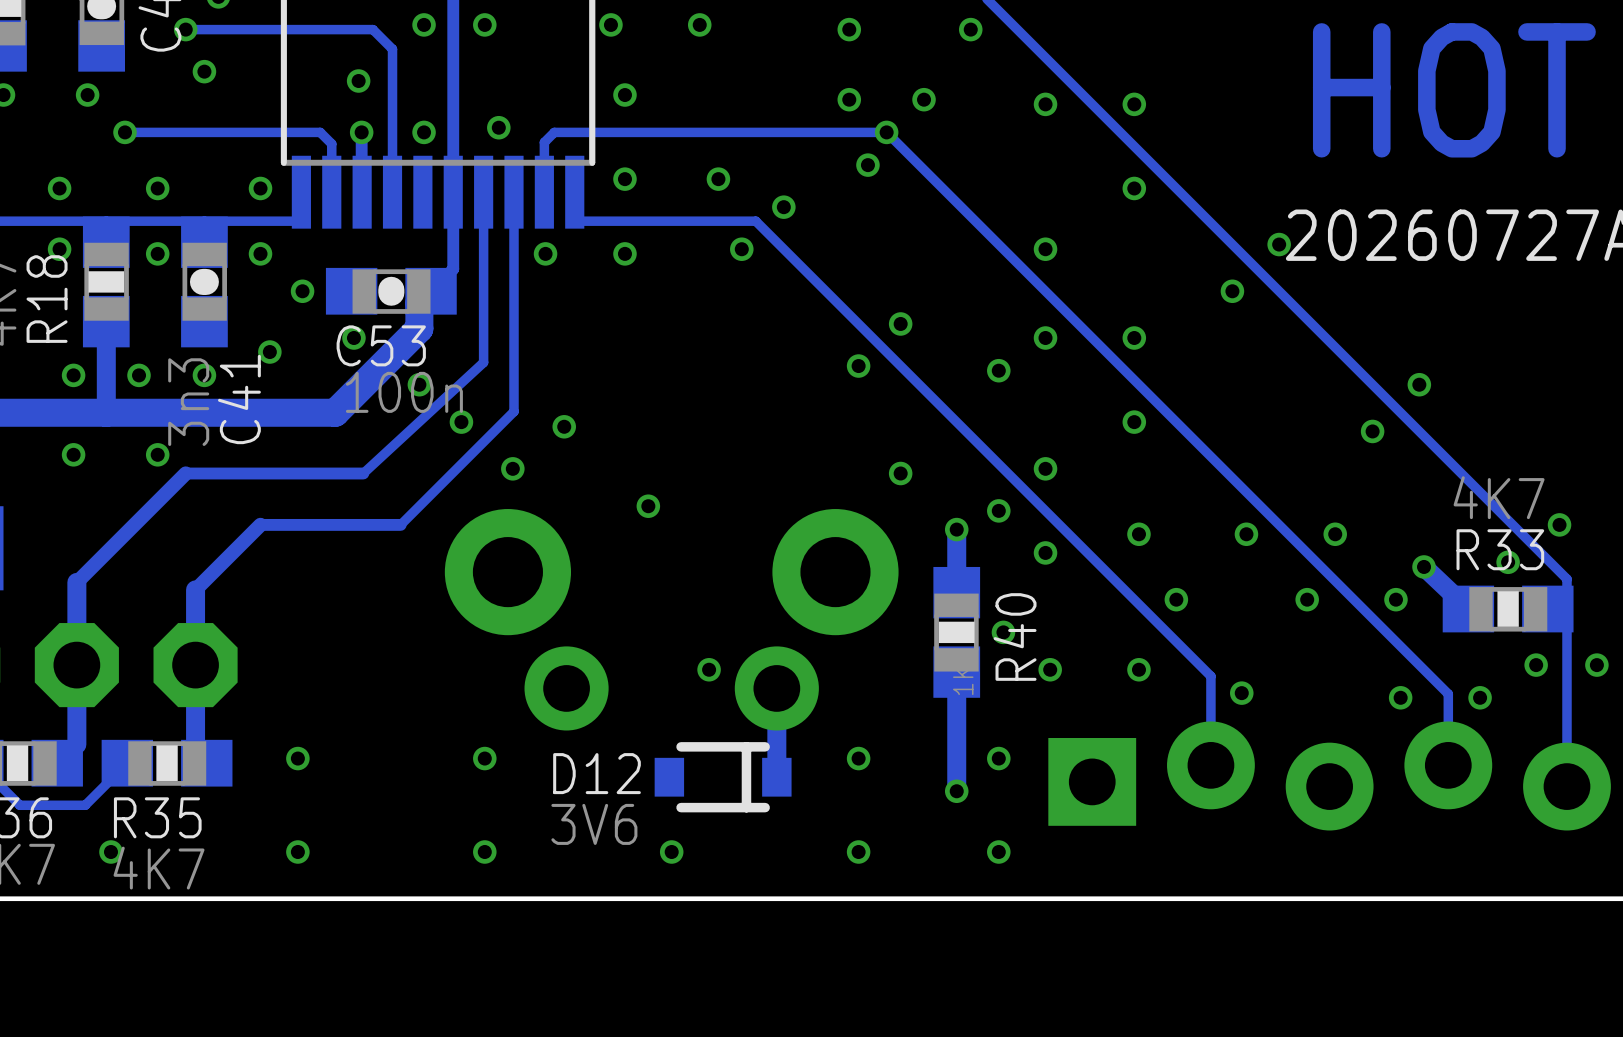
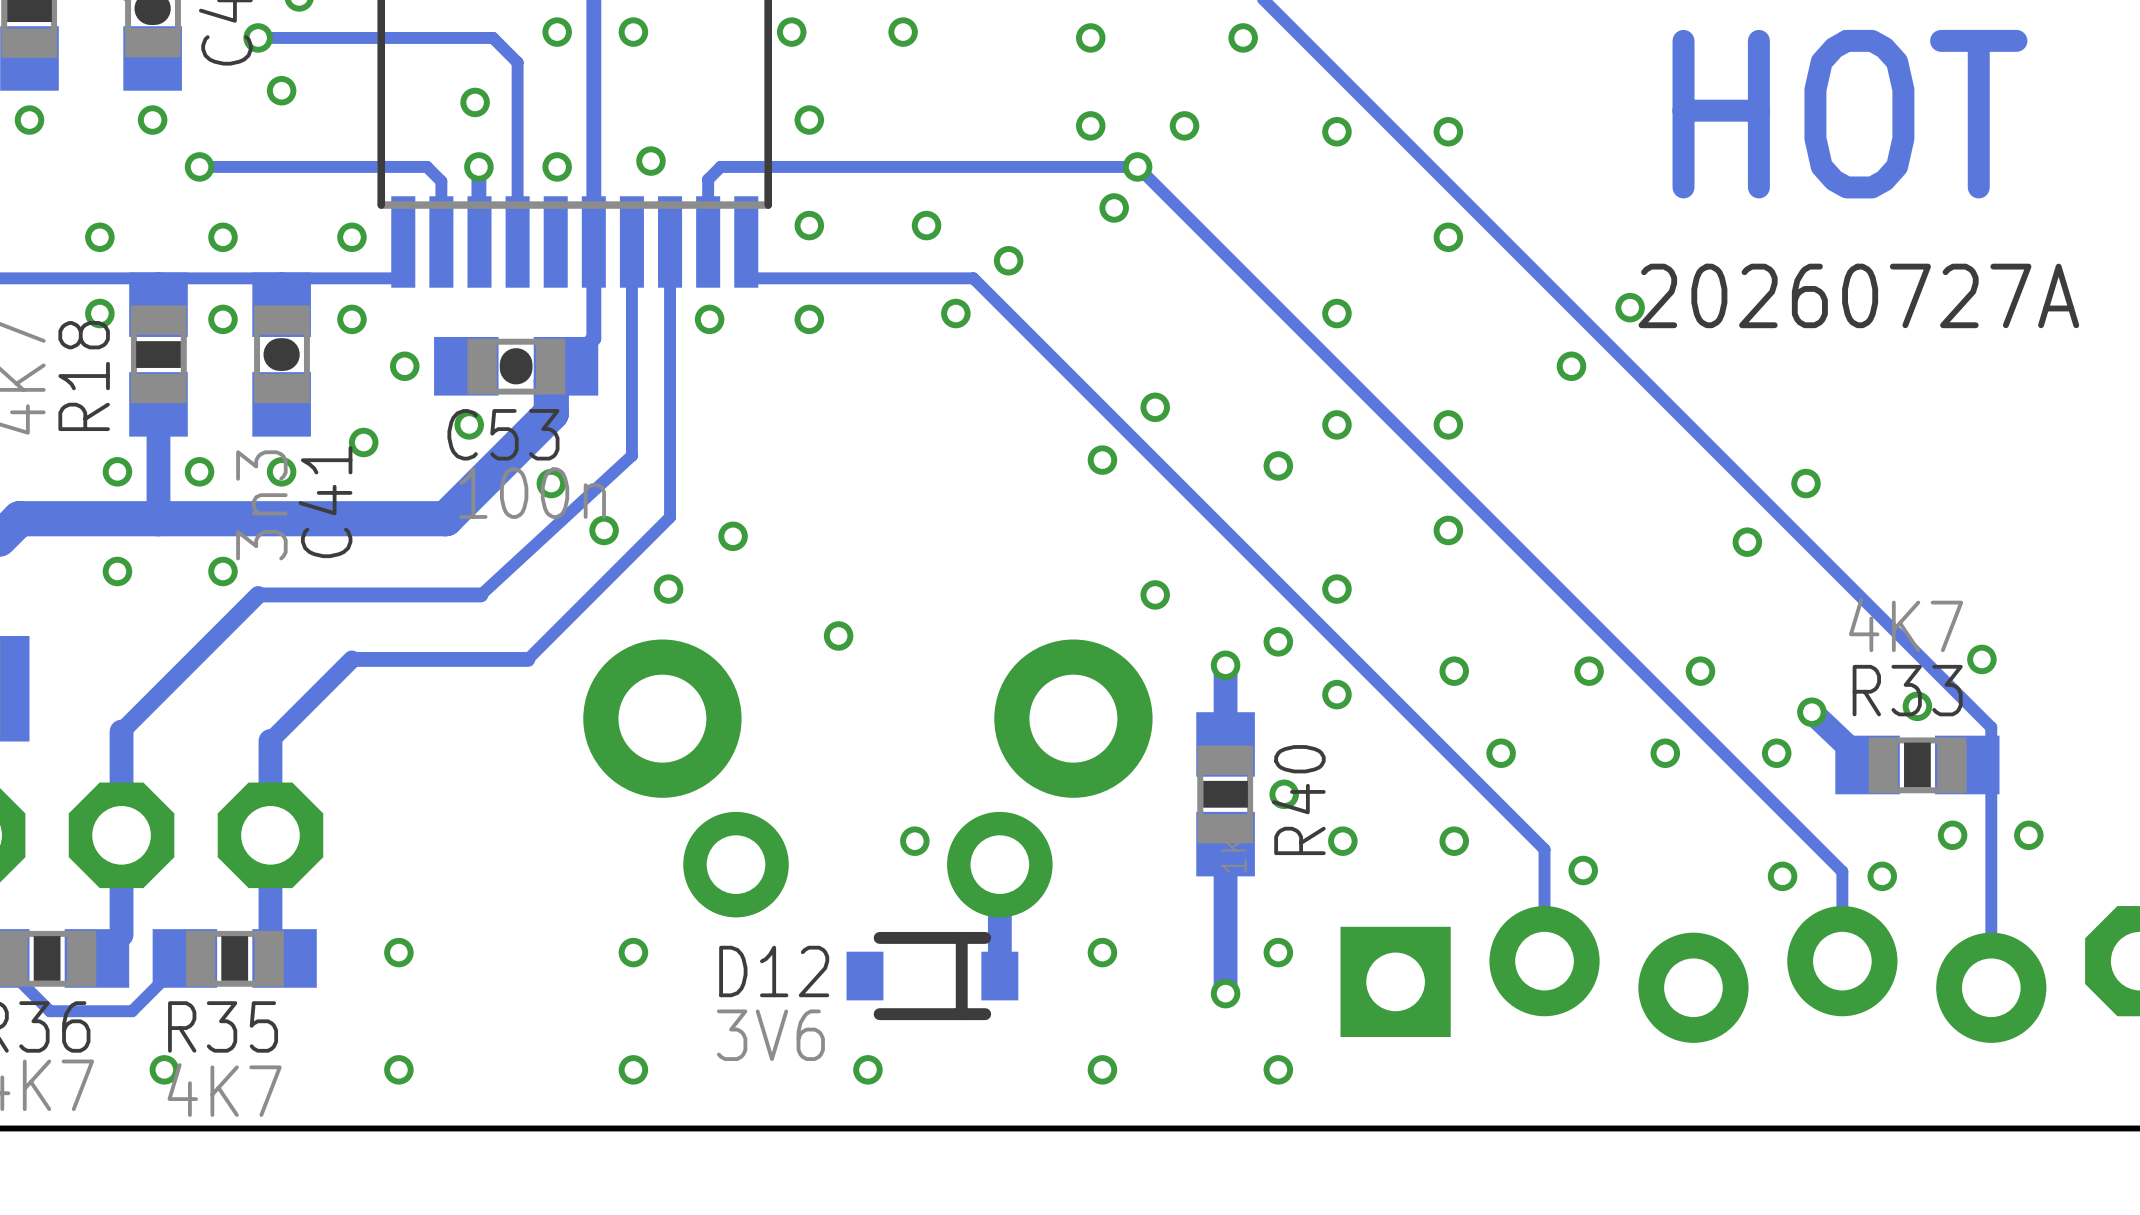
via position: (87, 95) -> (152, 120)
via position: (125, 132) -> (199, 166)

